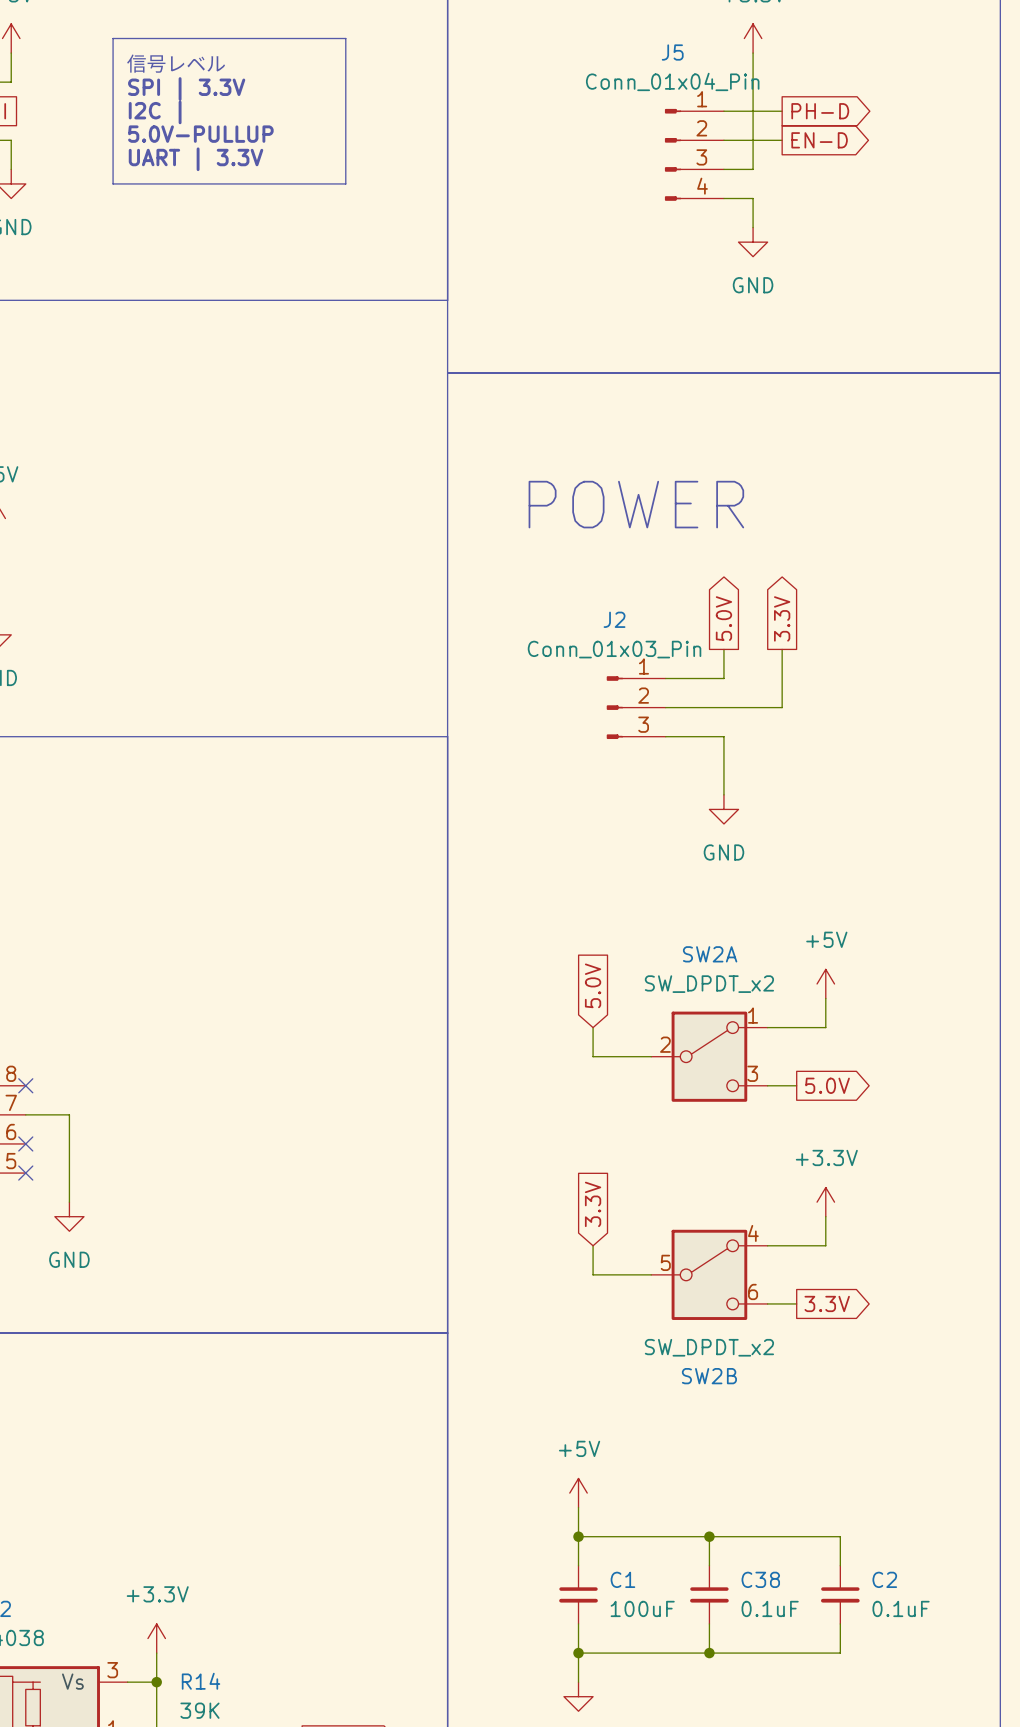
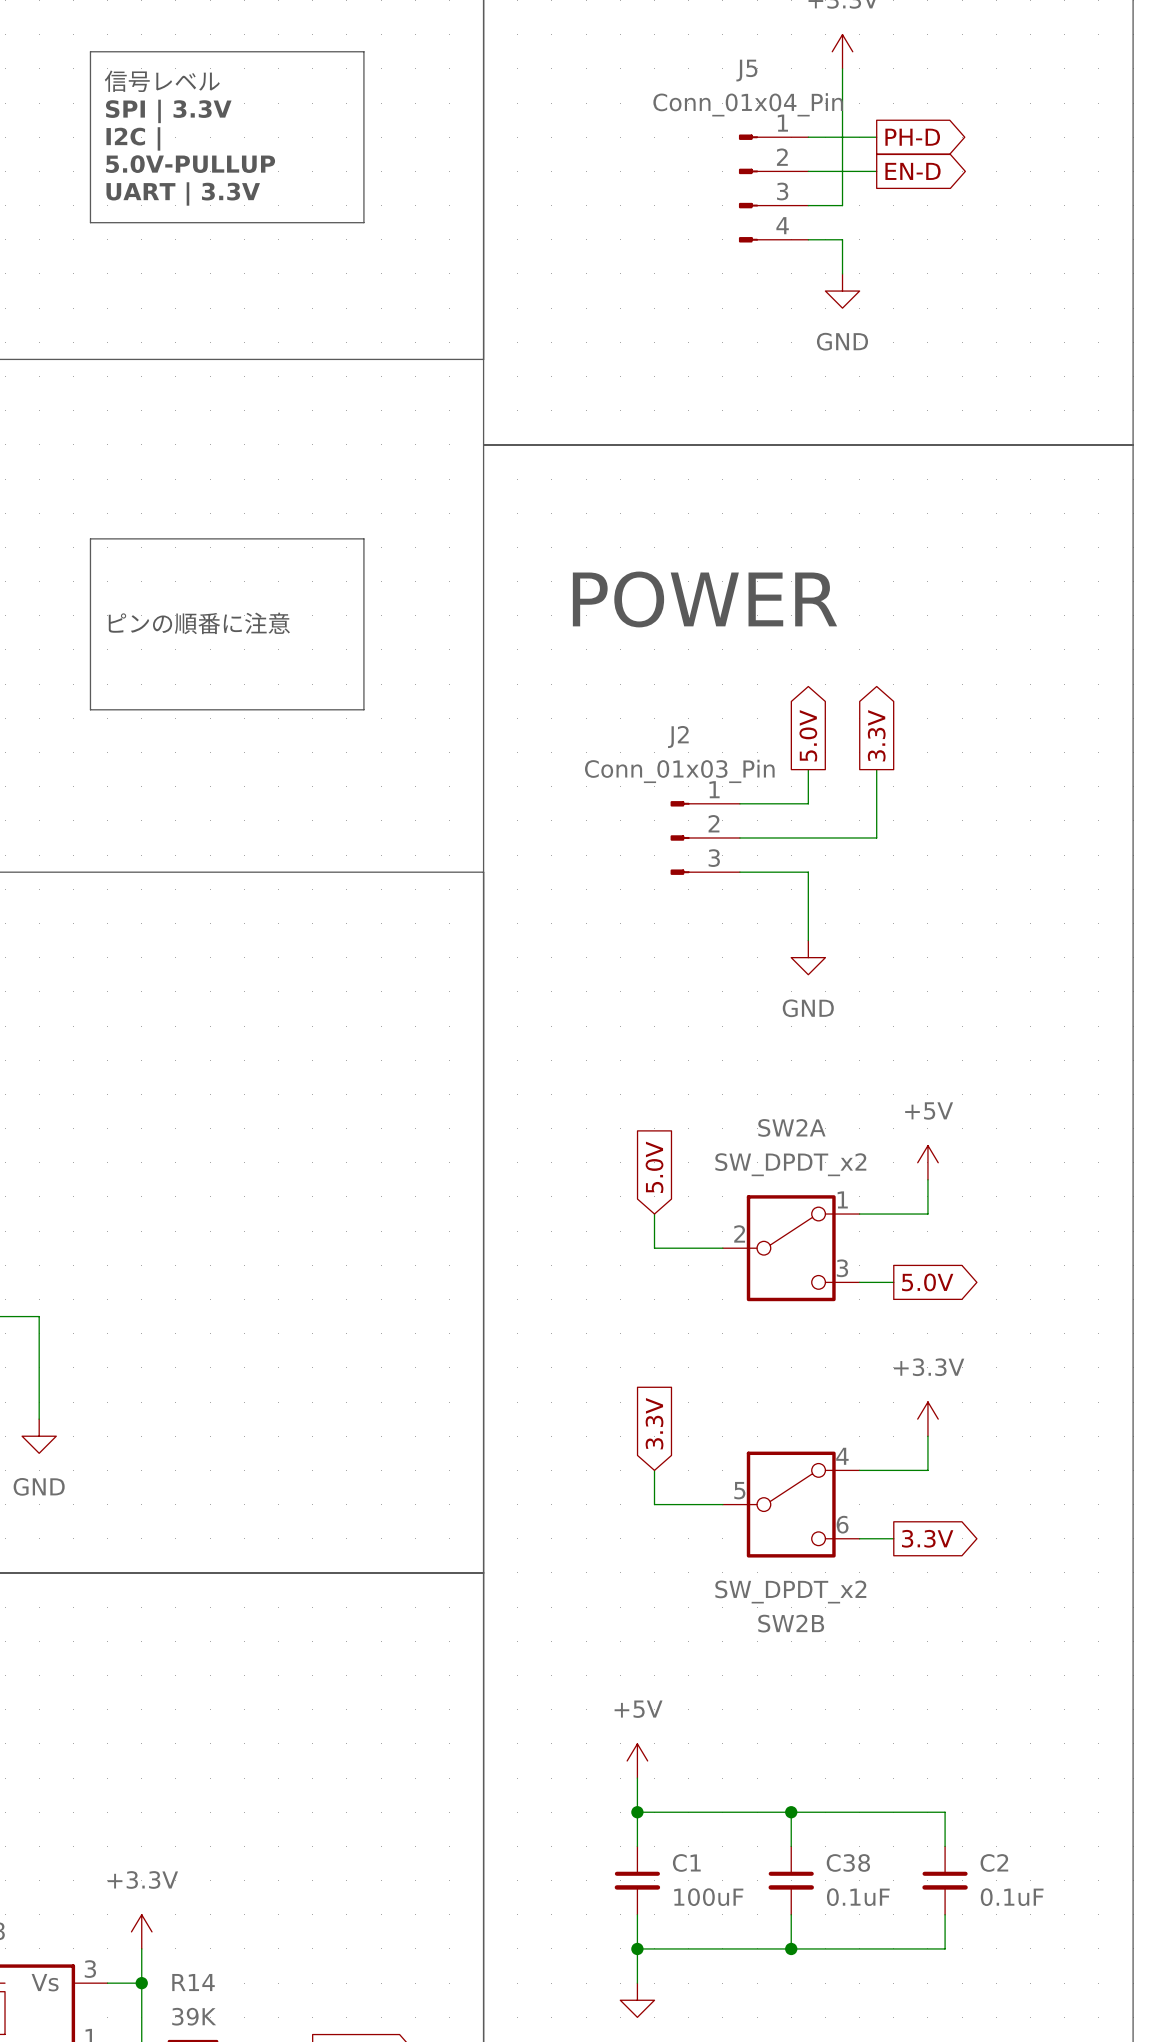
line: none -> (90, 538) (363, 538) (363, 709) (90, 709) (90, 538)
text: none -> ピンの順番に注意 (199, 623)

